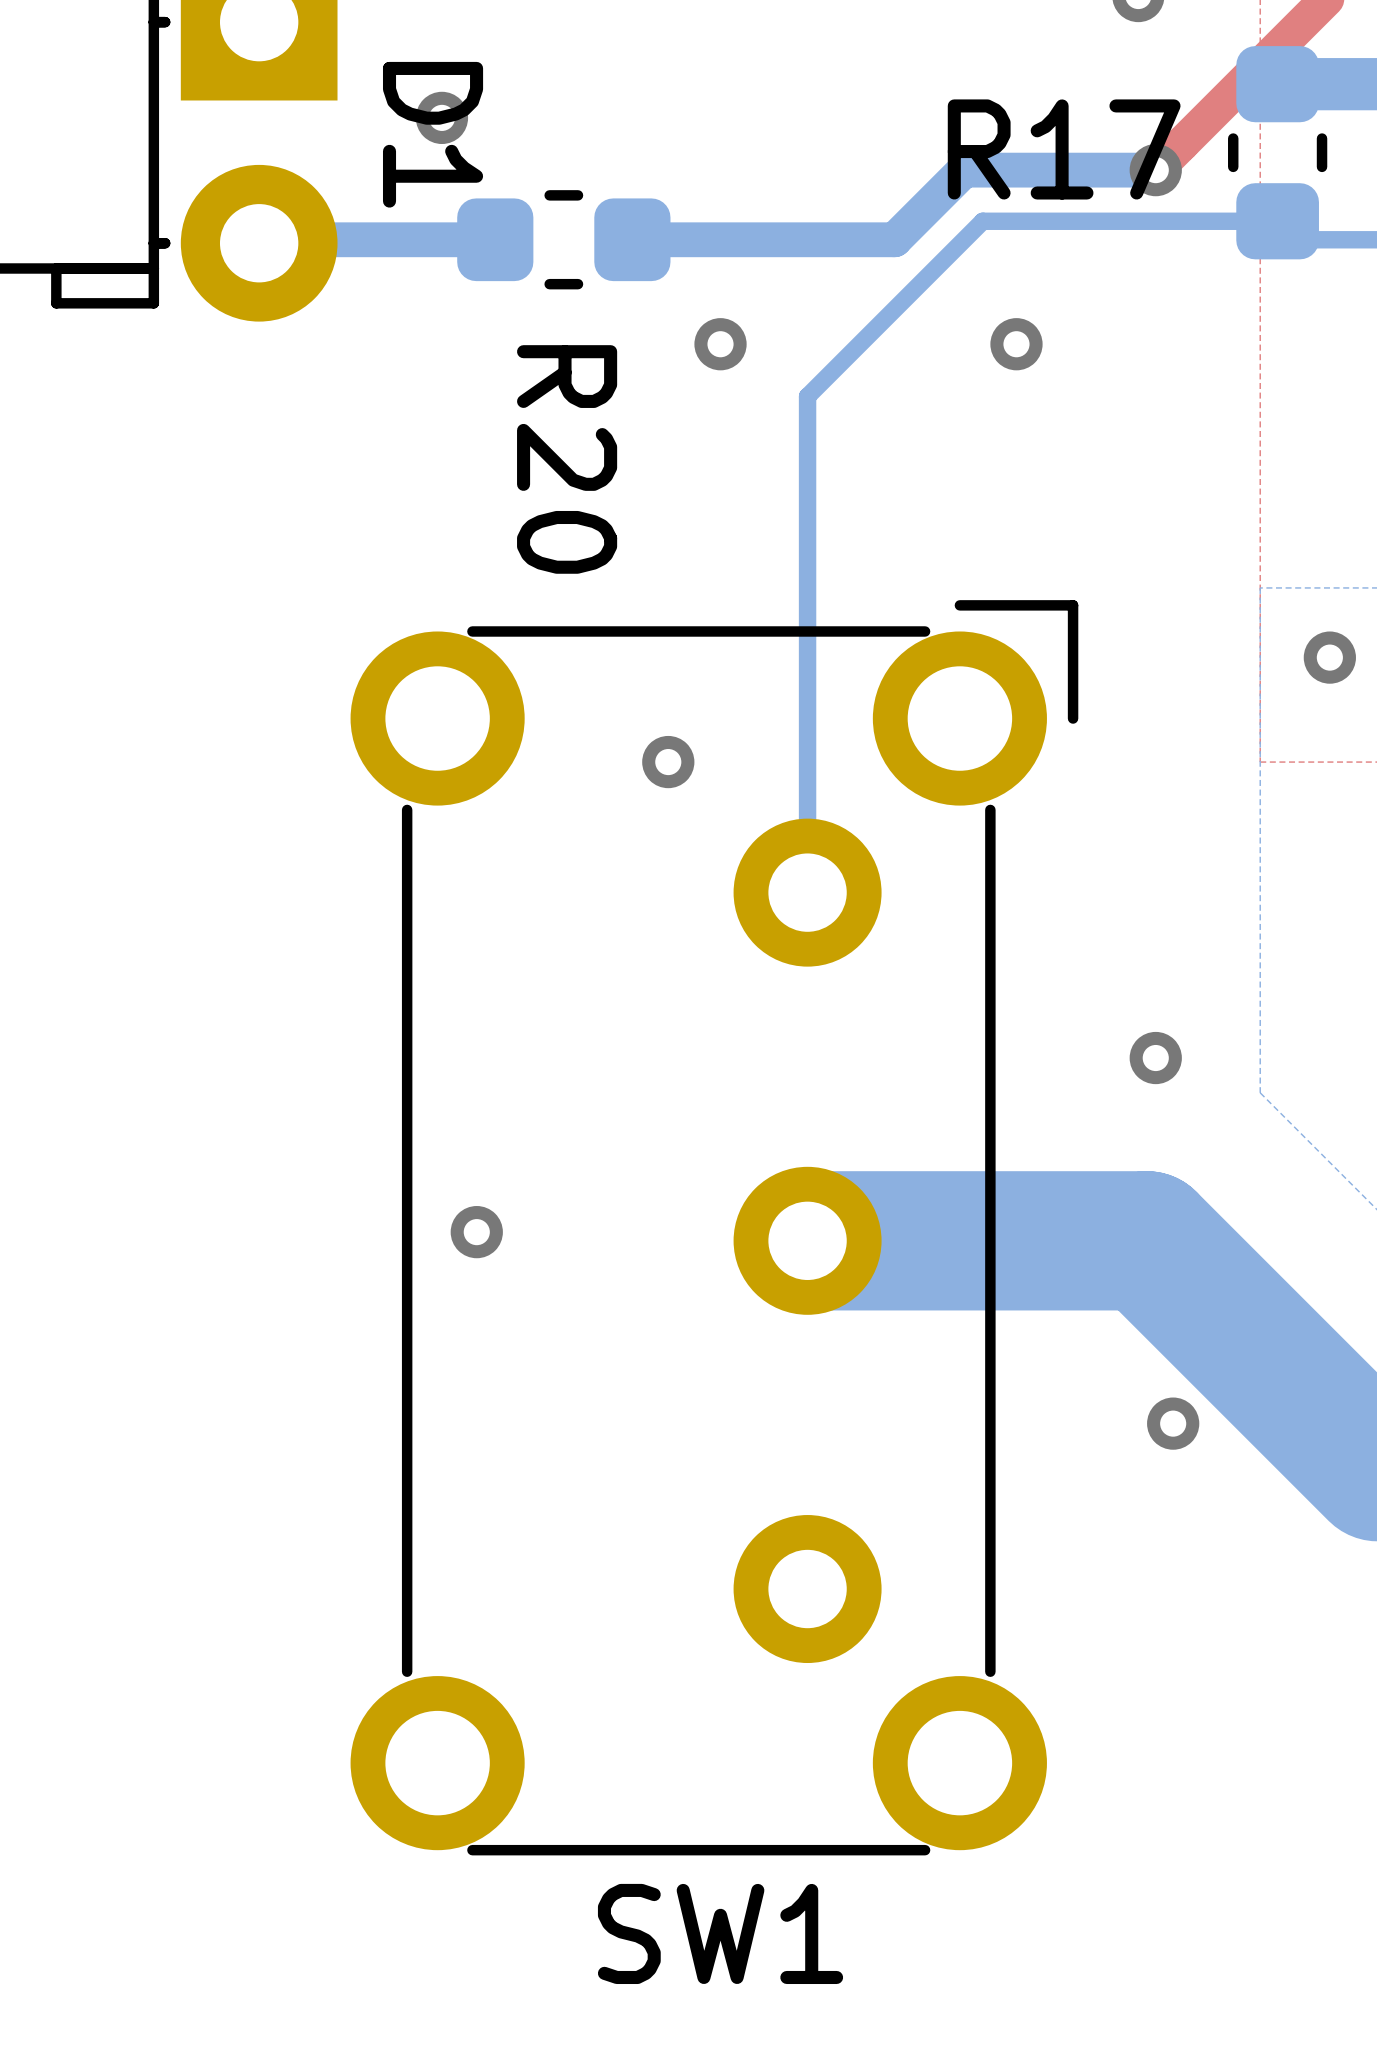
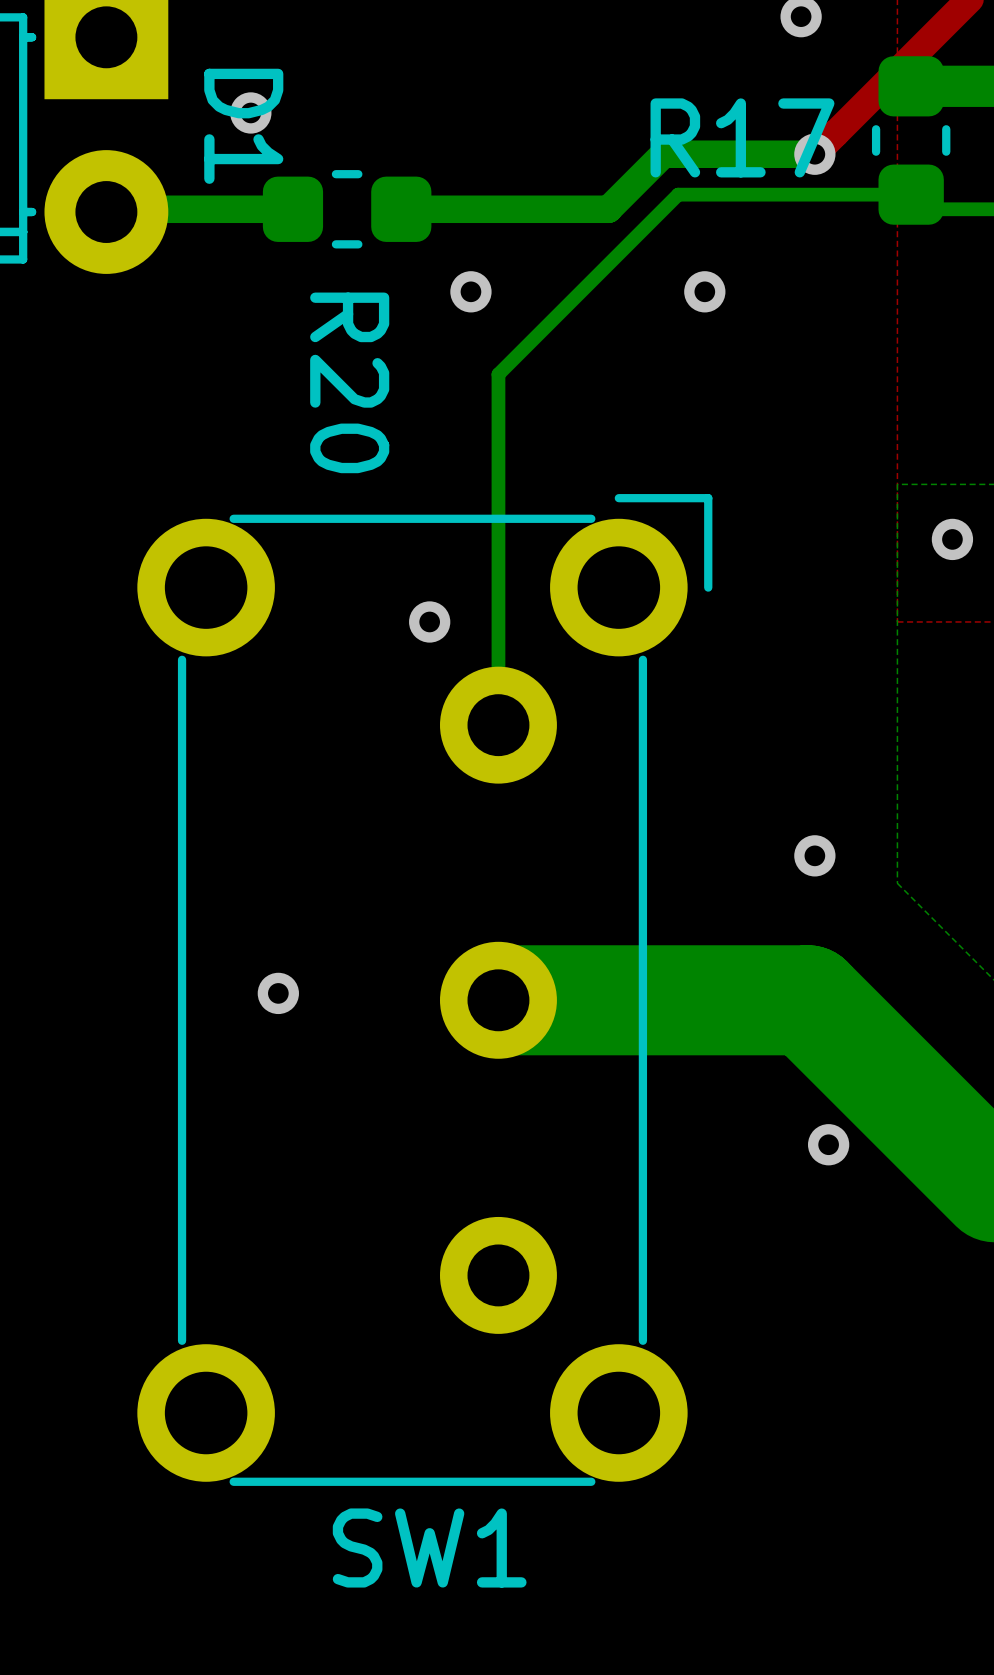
bottom track: (807, 396) (807, 892) -> (539, 333) (498, 374) (498, 725)
SW1 position: (714, 1227) -> (424, 989)

